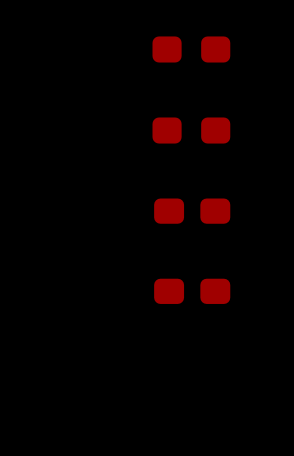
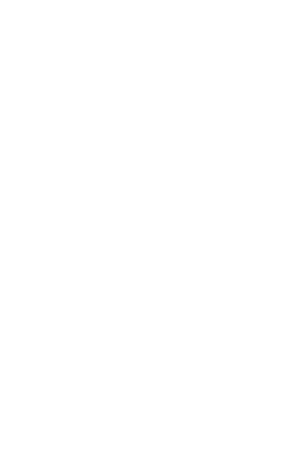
part: (191, 49) -> none
part: (191, 130) -> none
part: (192, 211) -> none
part: (192, 291) -> none

